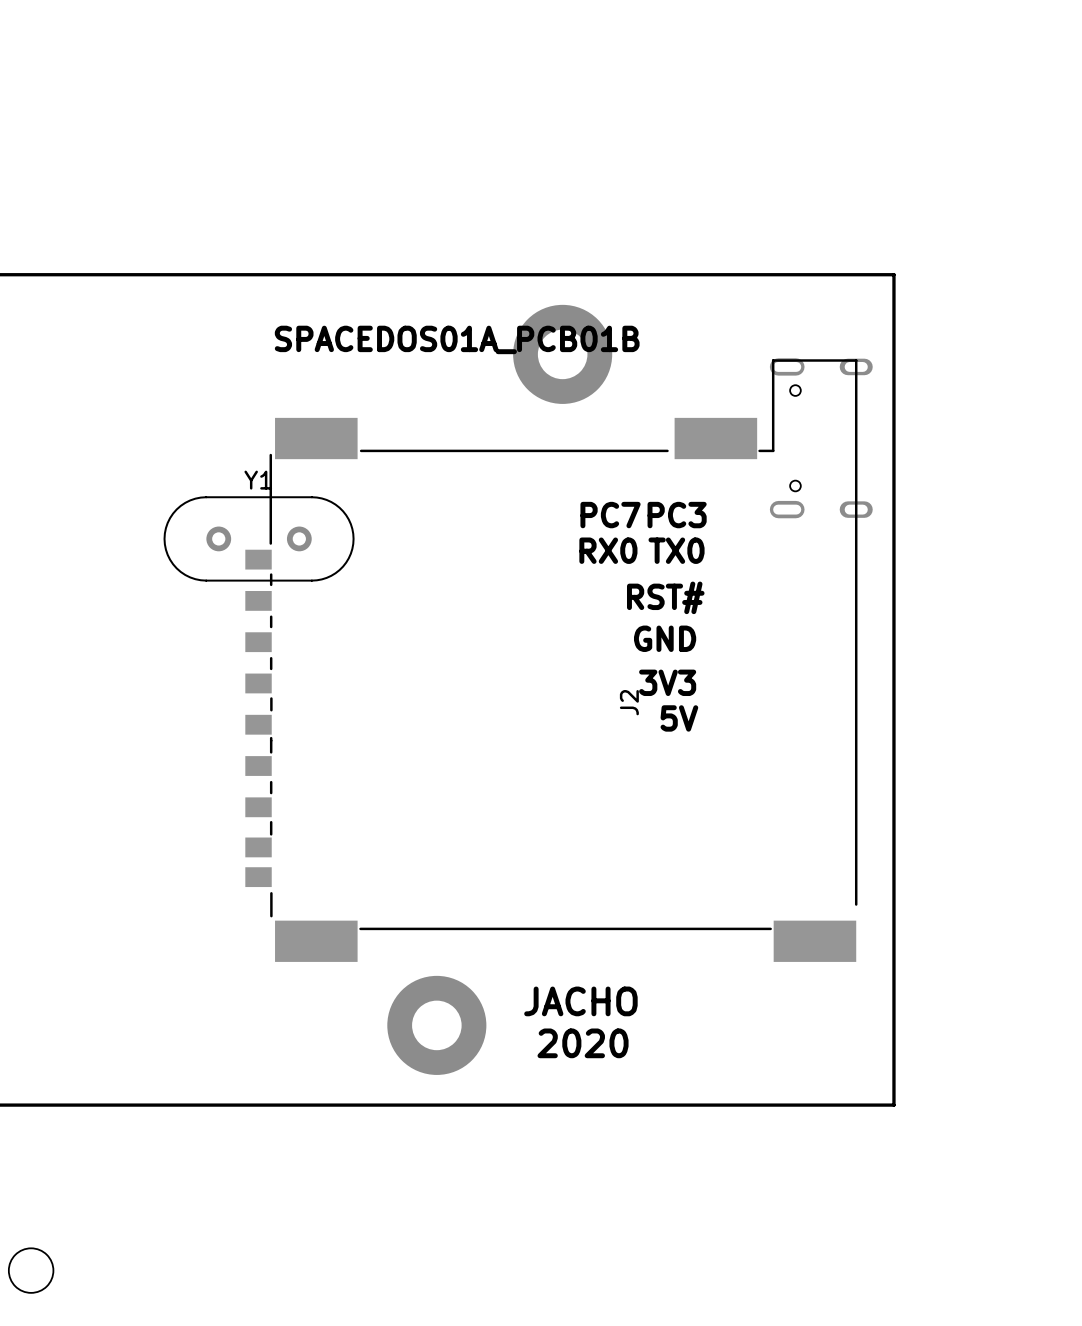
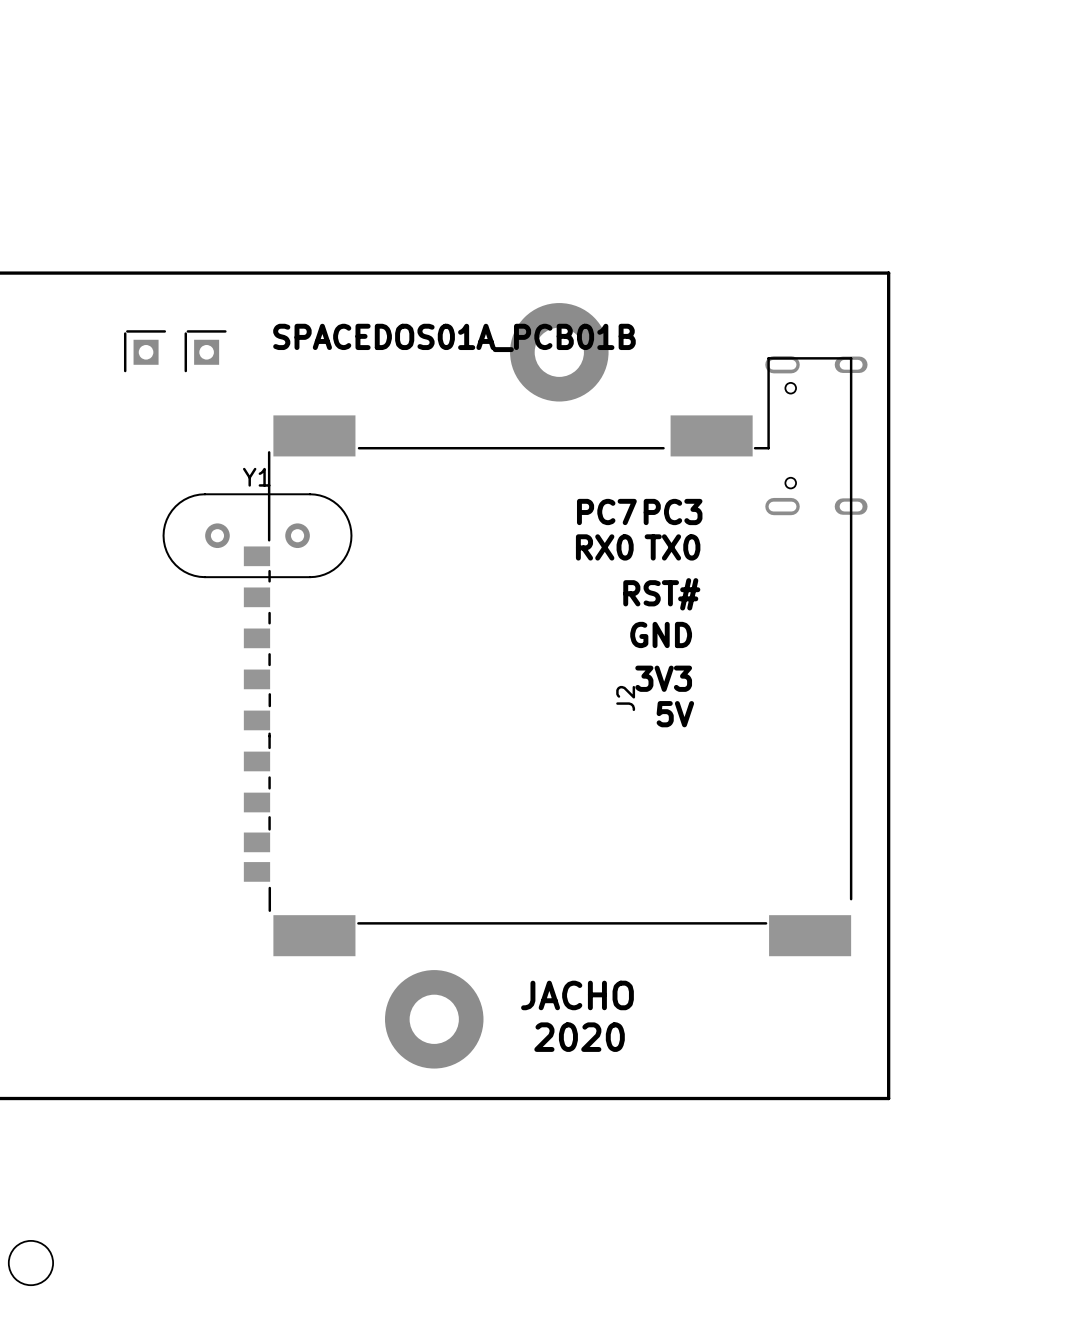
part: none -> (145, 351)
part: none -> (205, 351)

